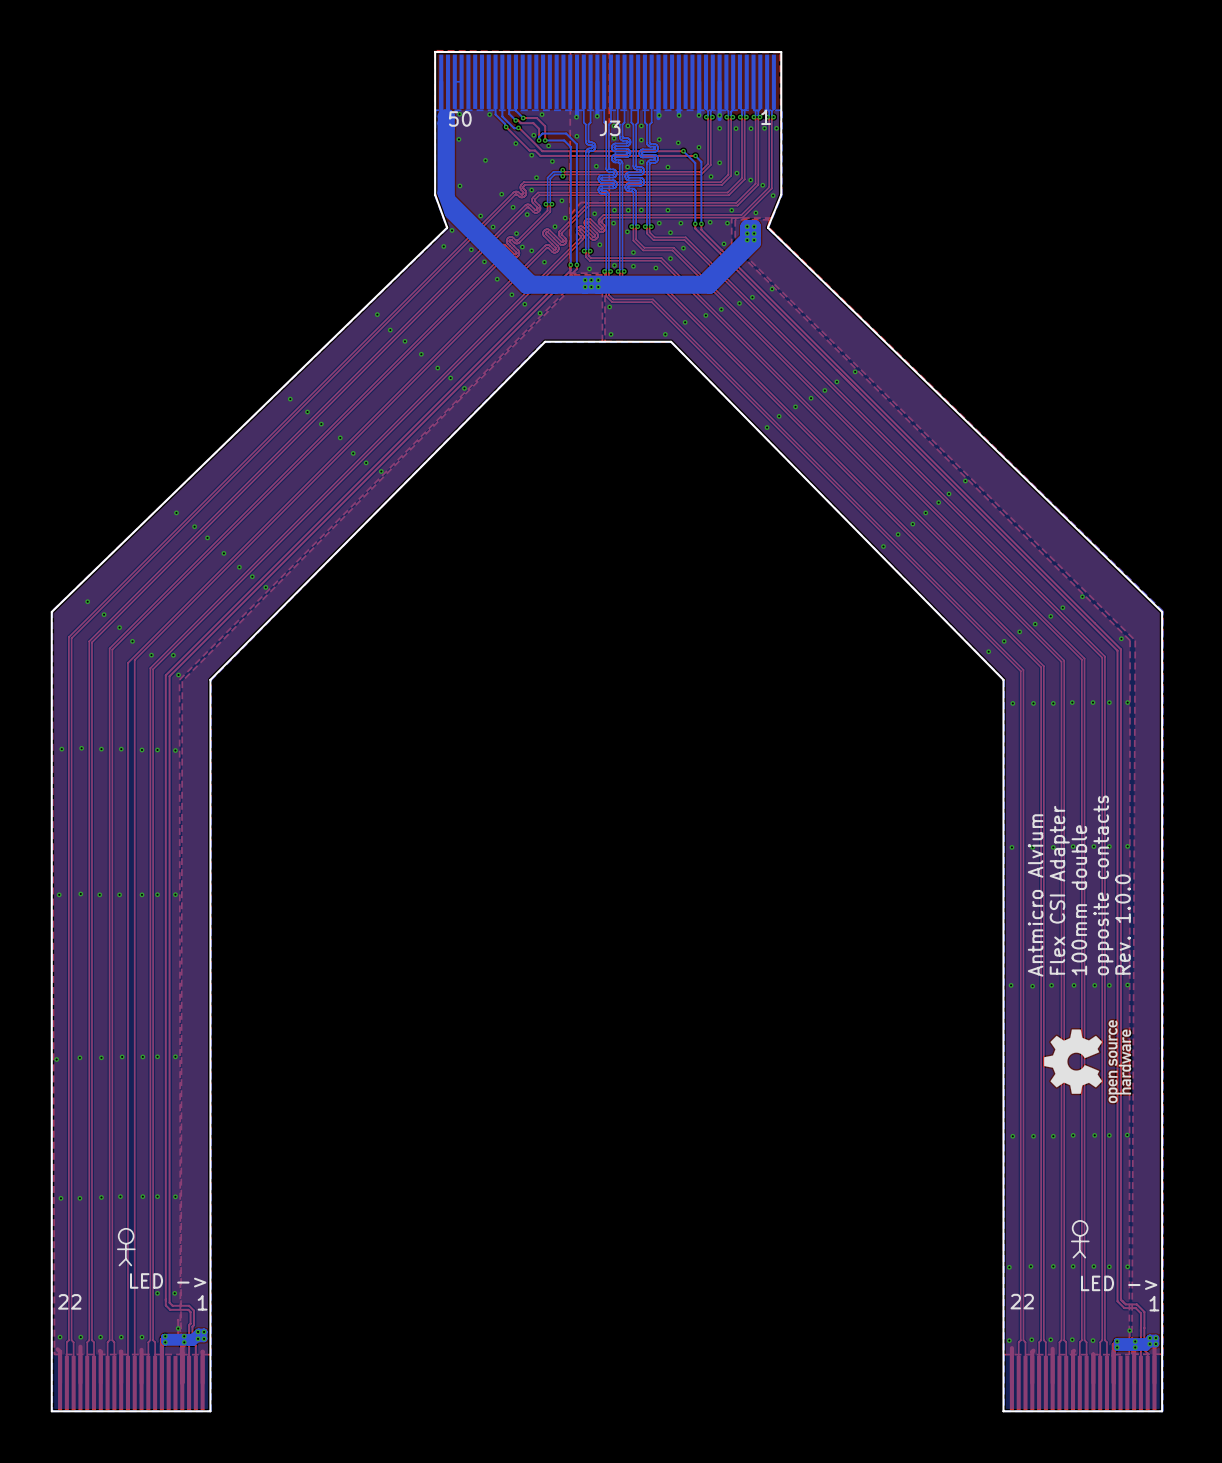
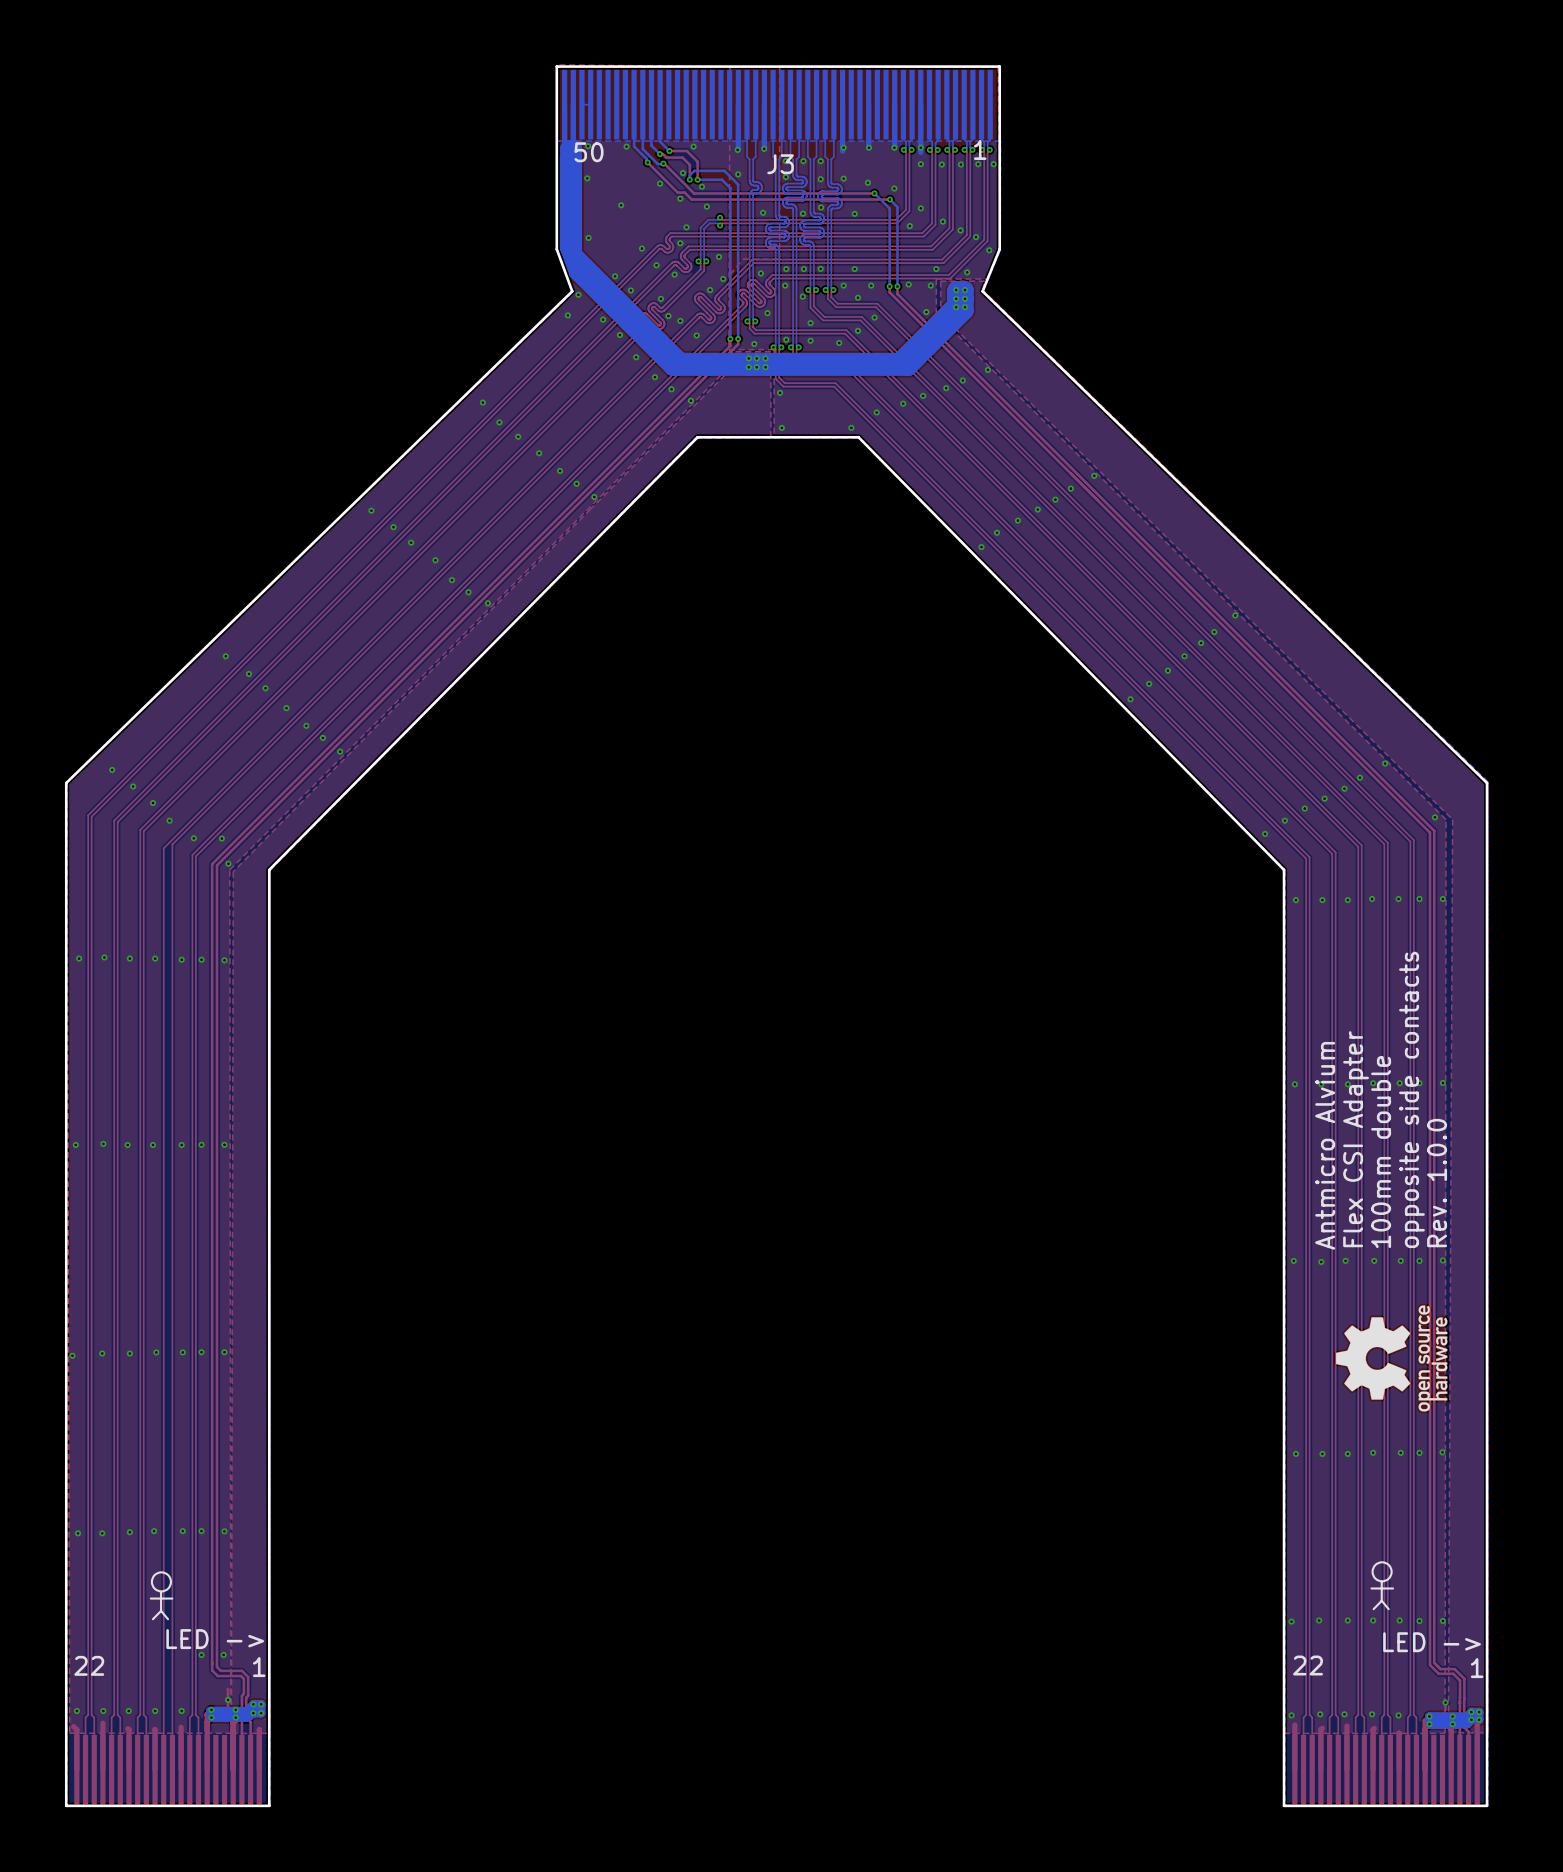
text: opposite contacts (1103, 885) -> opposite side contacts (1411, 1099)

